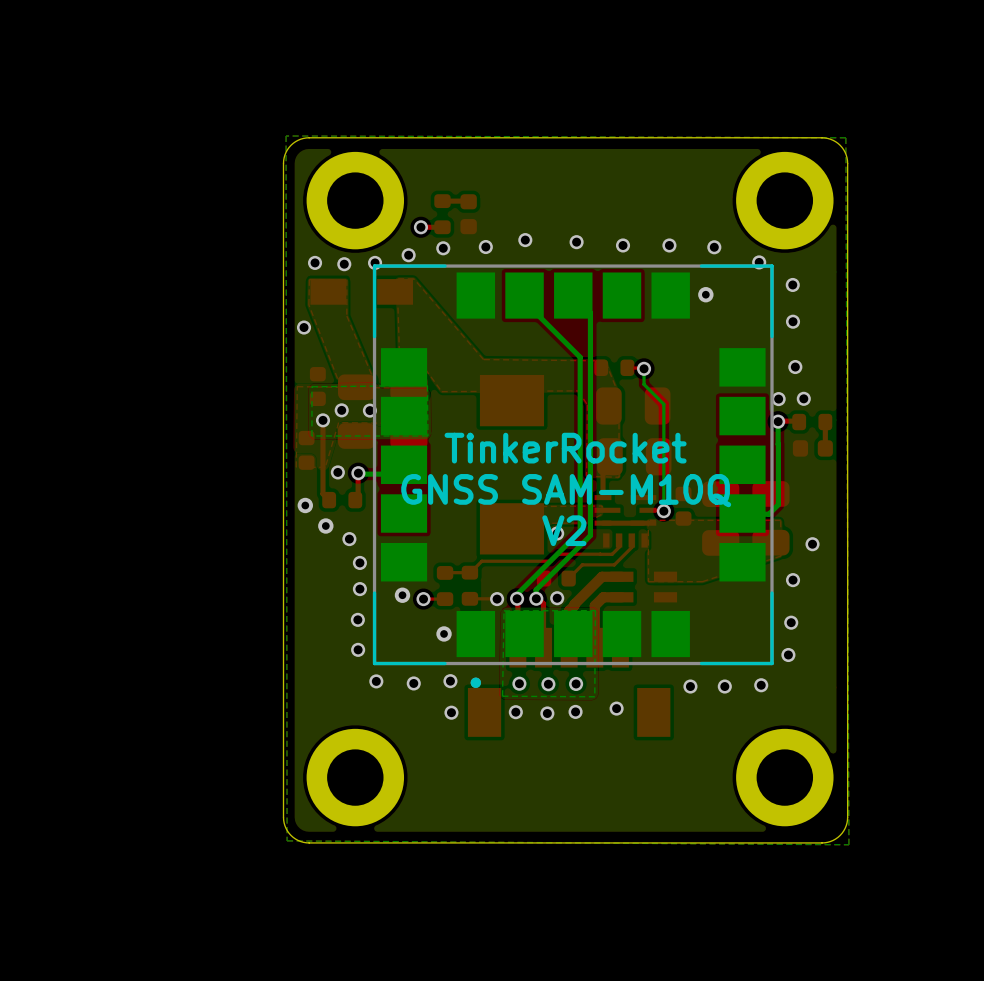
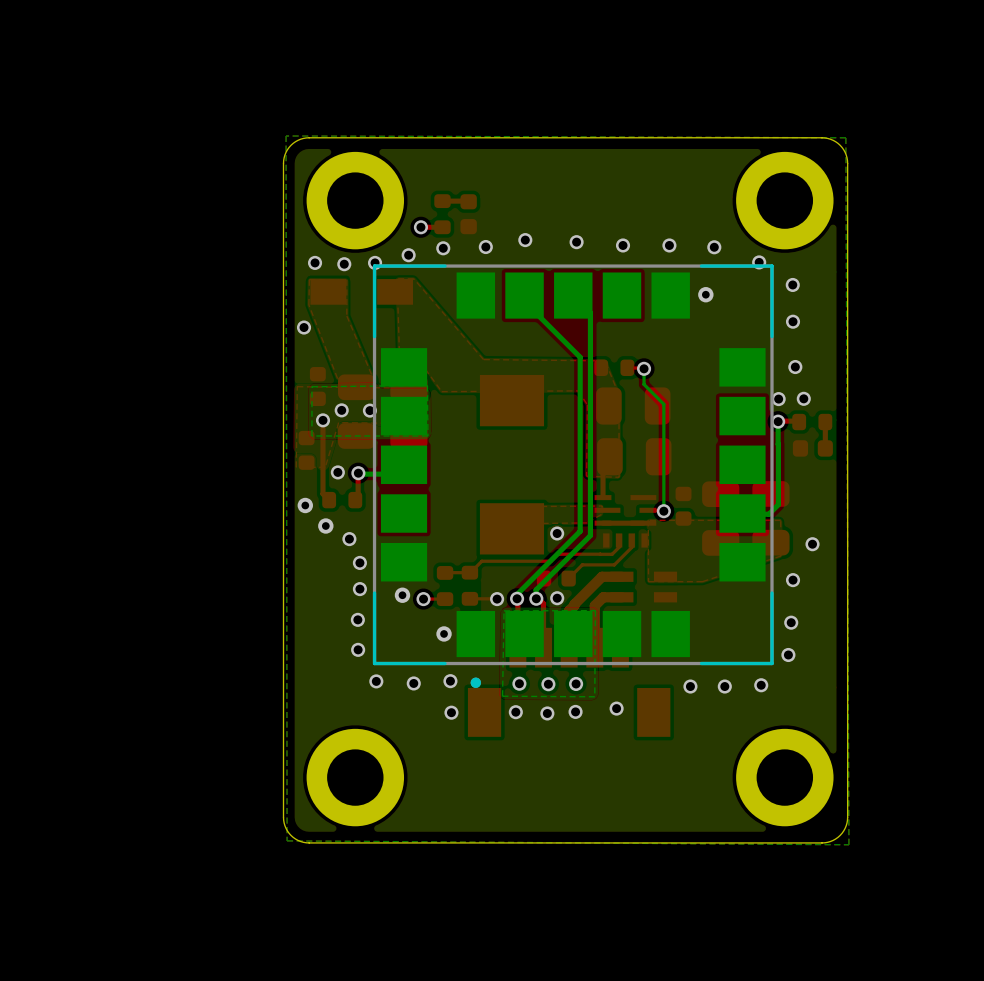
text: TinkerRocket (565, 448) -> none
text: GNSS SAM-M10Q (566, 490) -> none
text: V2 (564, 530) -> none

